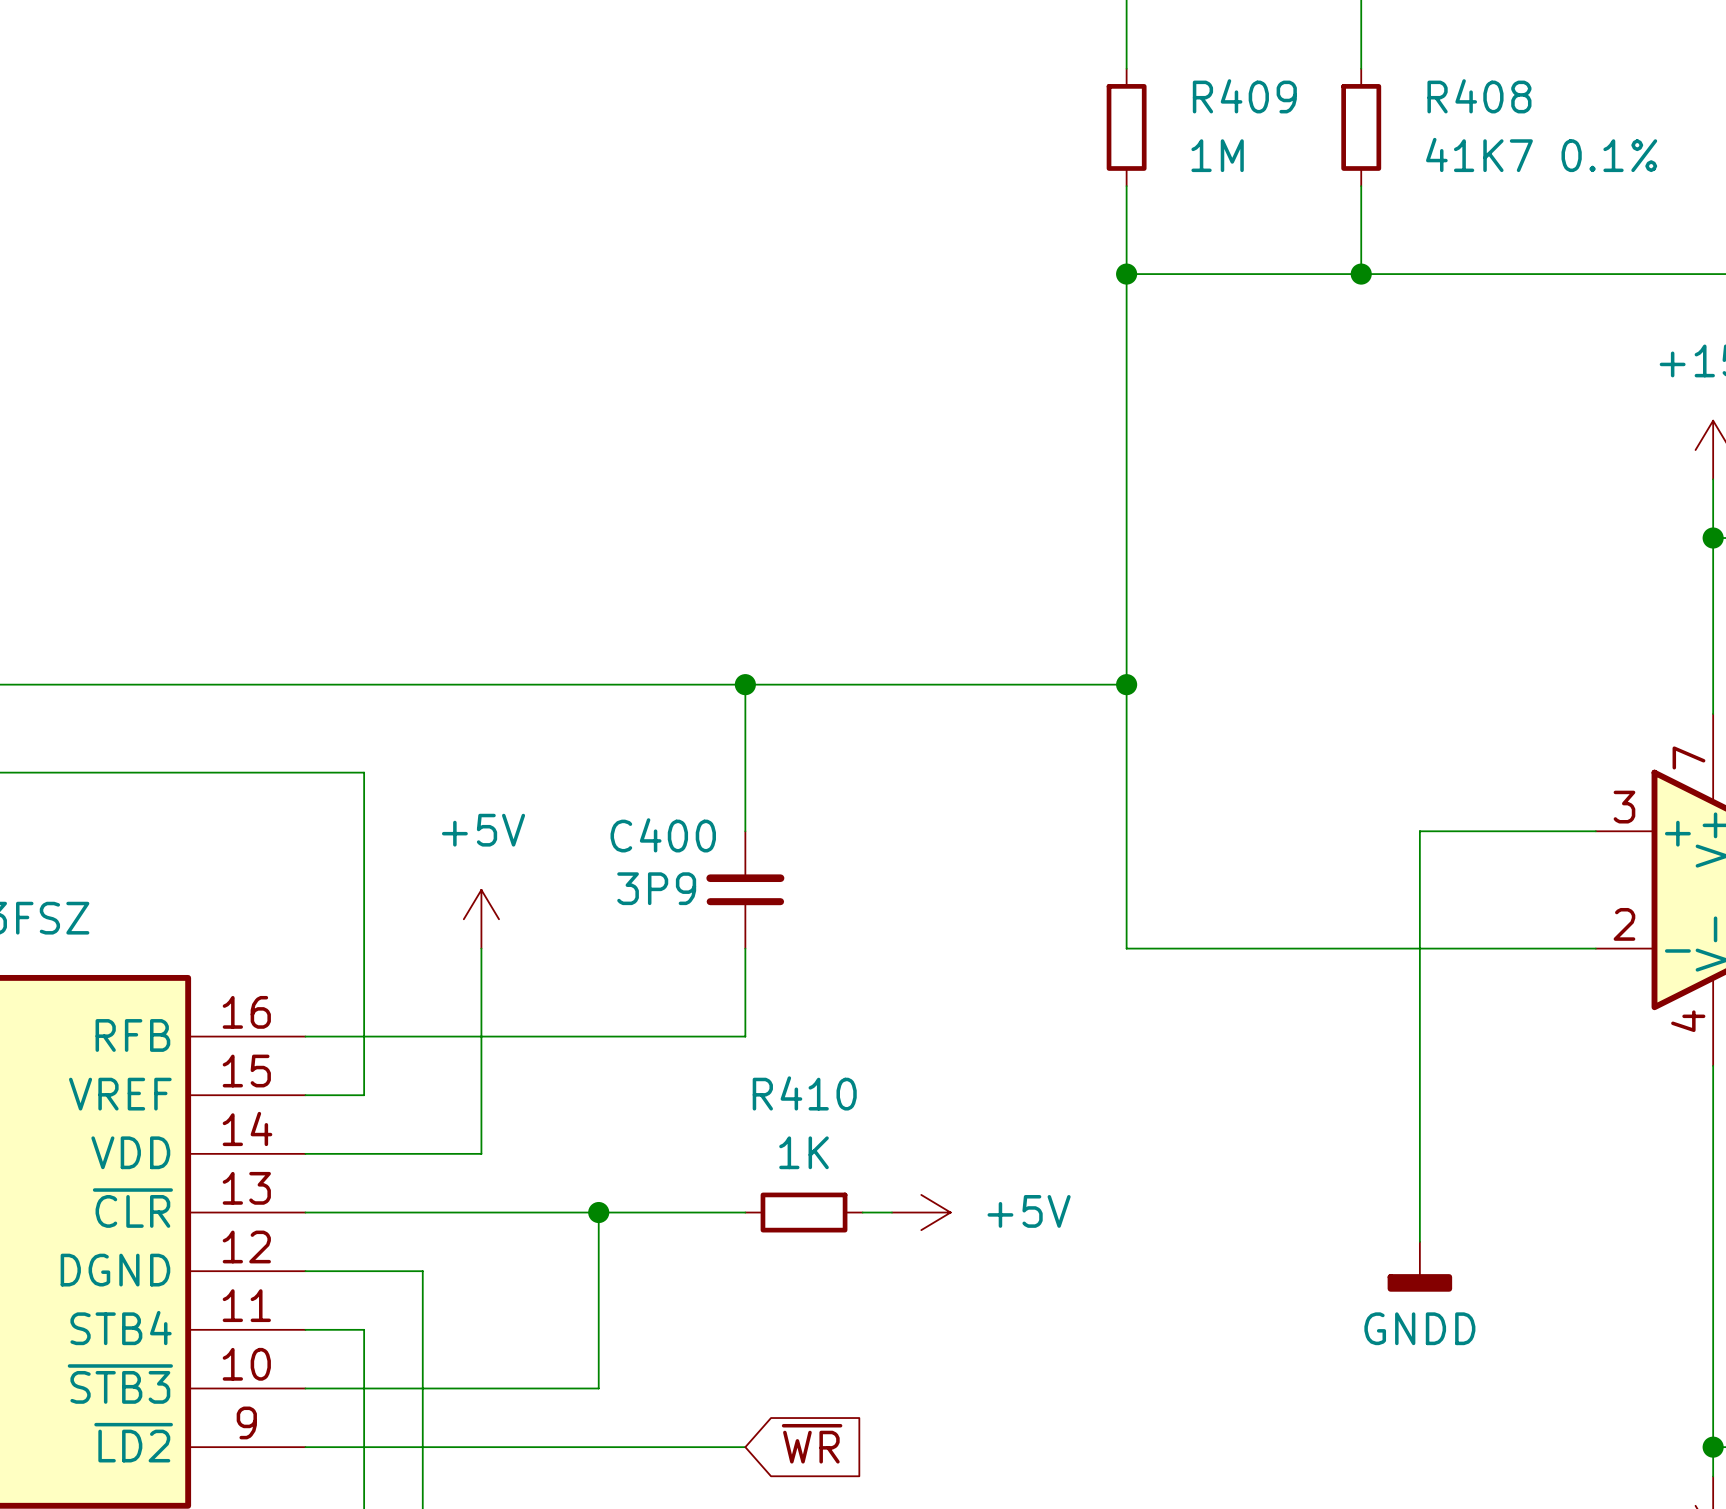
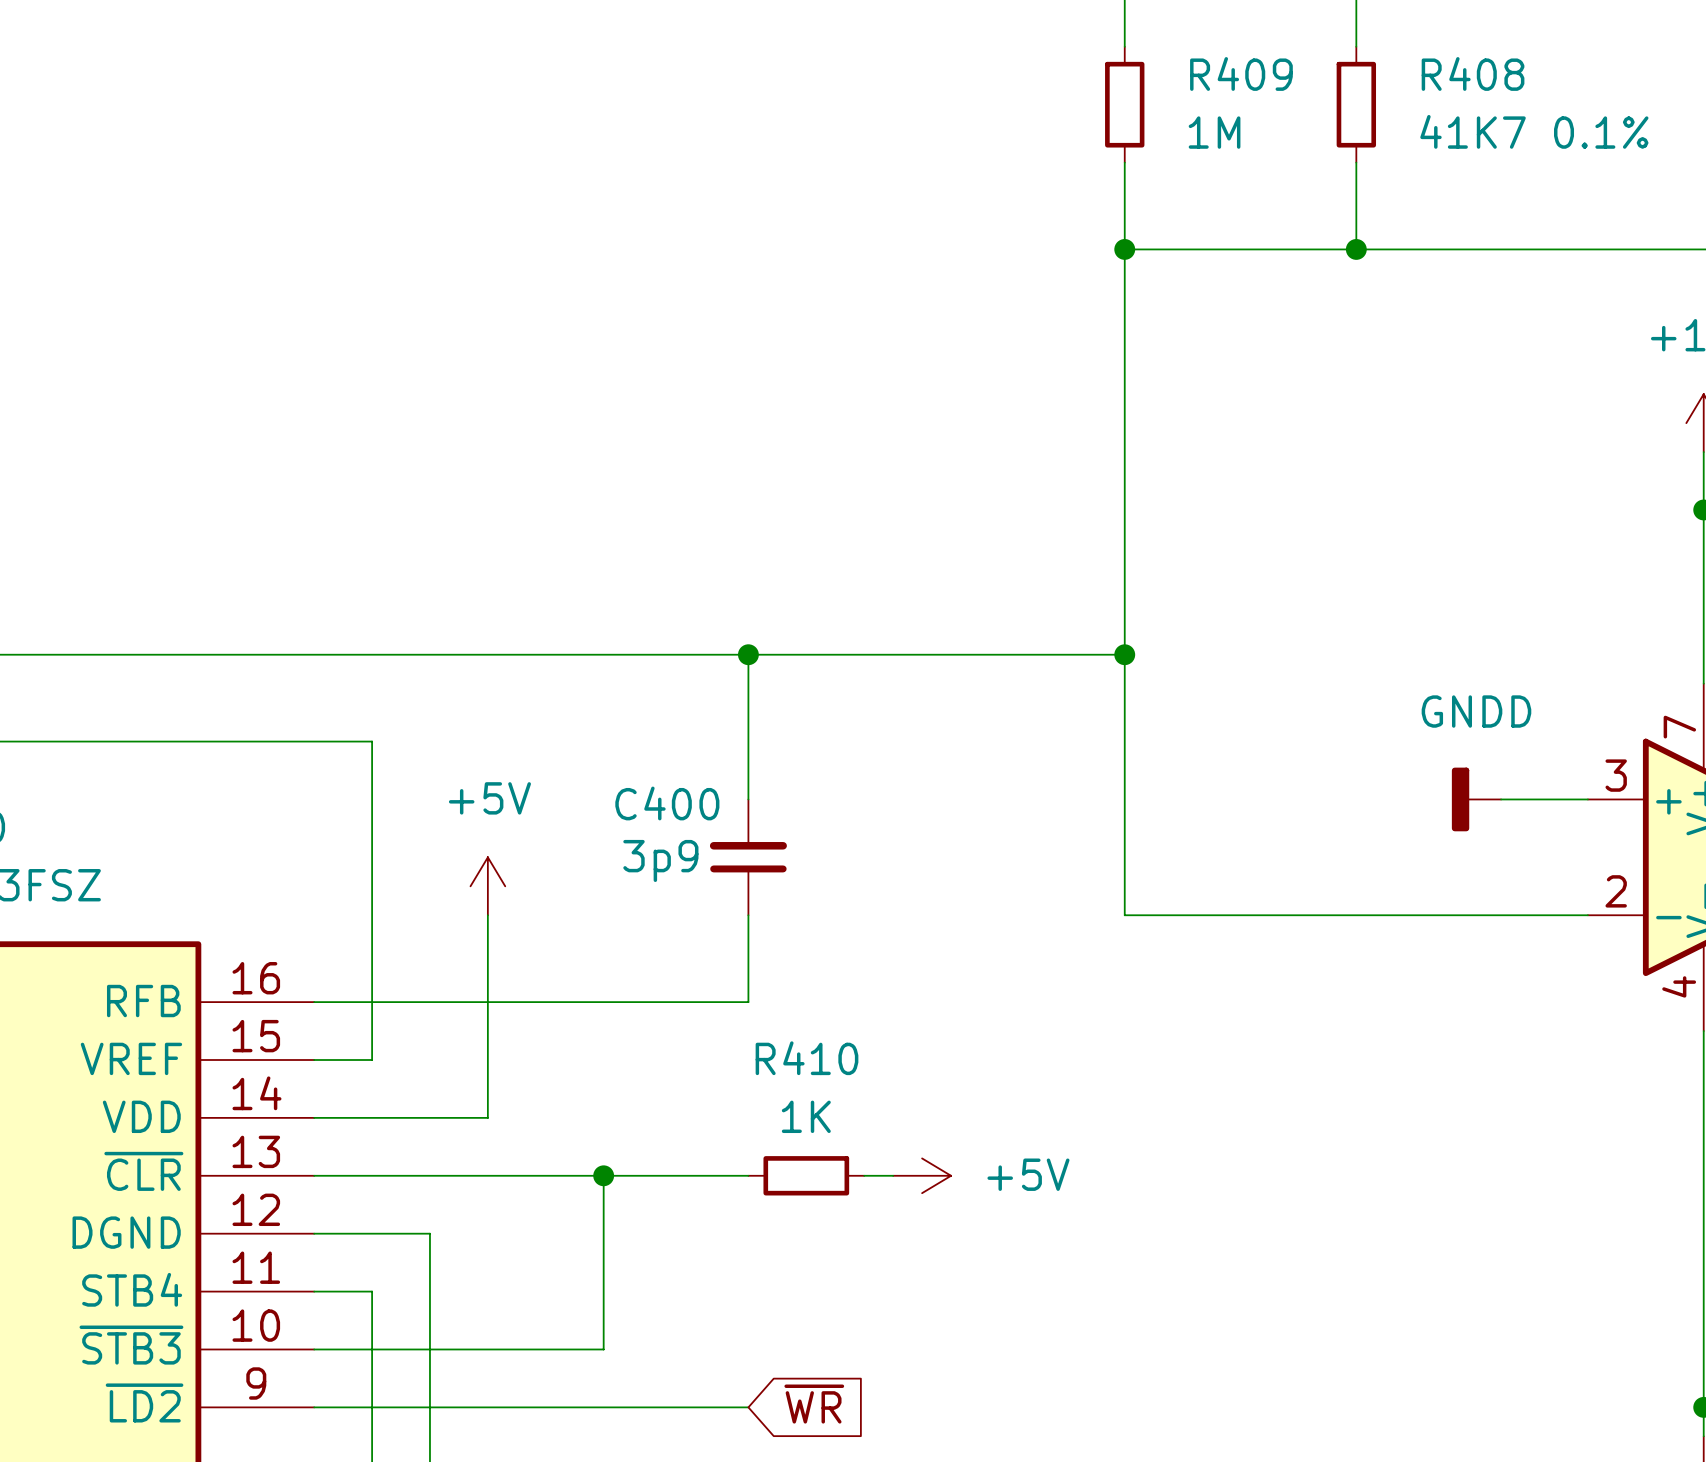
wire: (1507, 831) (1419, 831) (1419, 1241) -> none
C400 value: 3P9 (656, 888) -> 3p9 (660, 860)
power symbol rotation: 0° (1419, 1266) -> 90° clockwise (1476, 799)
power symbol position: GNDD (1419, 1266) -> GNDD (1476, 799)
power symbol text position: GNDD (1419, 1328) -> GNDD (1476, 711)

